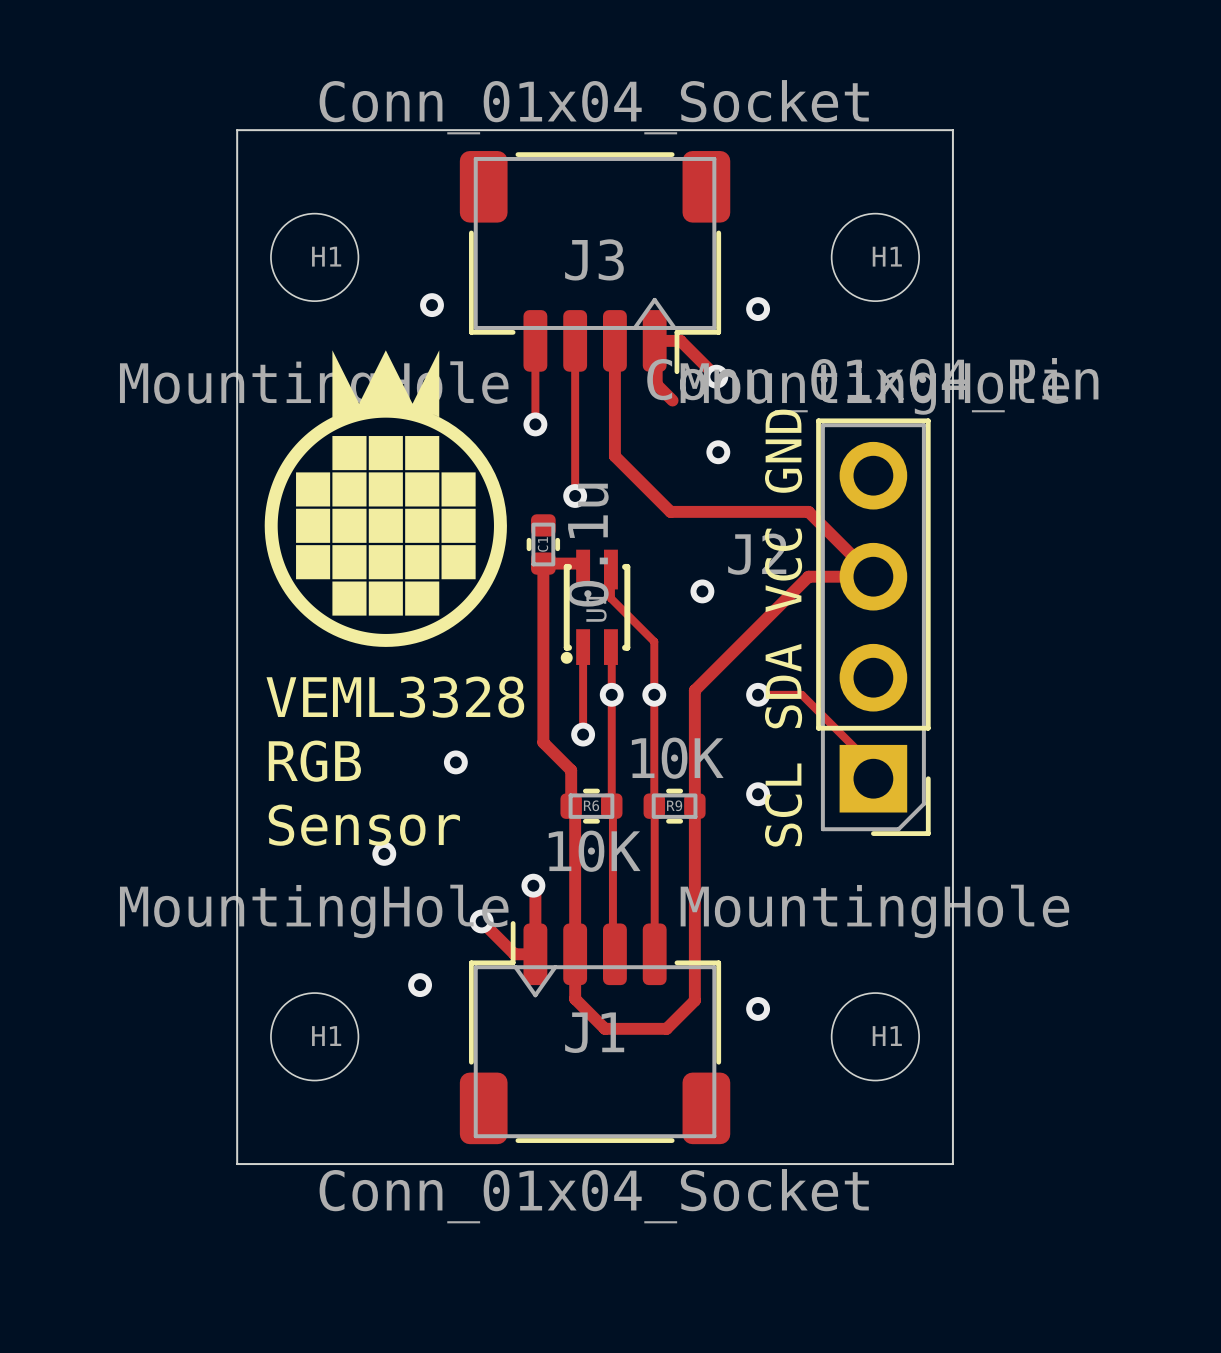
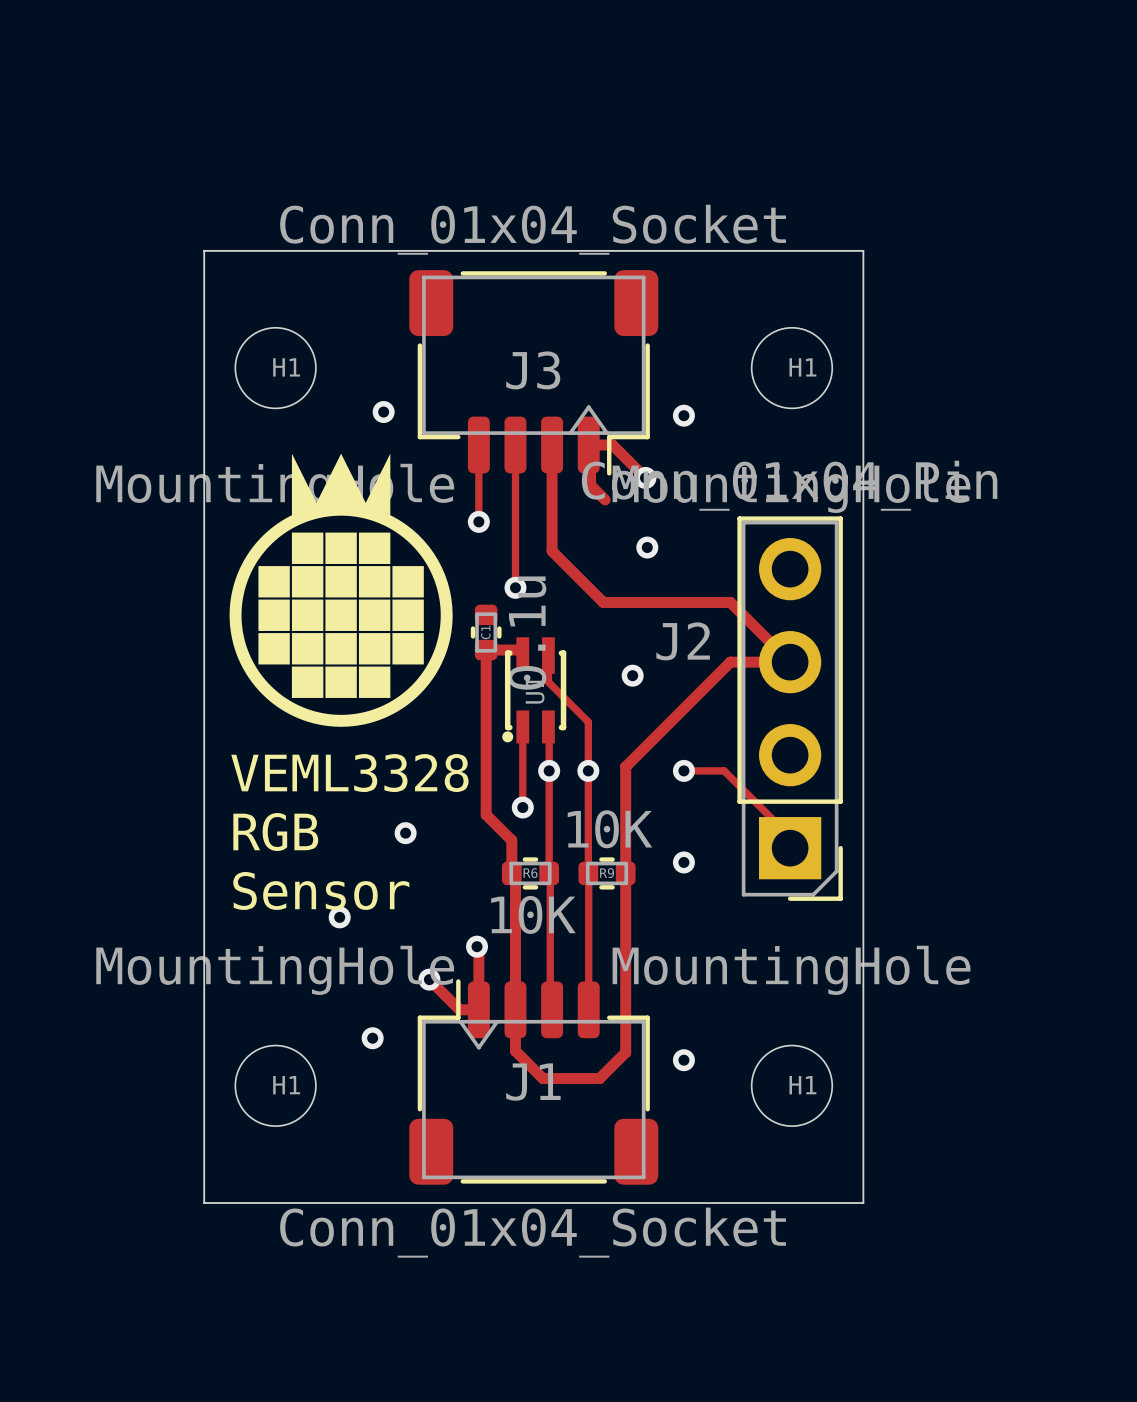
text: SCL SDA VCC GND (783, 628) -> none

